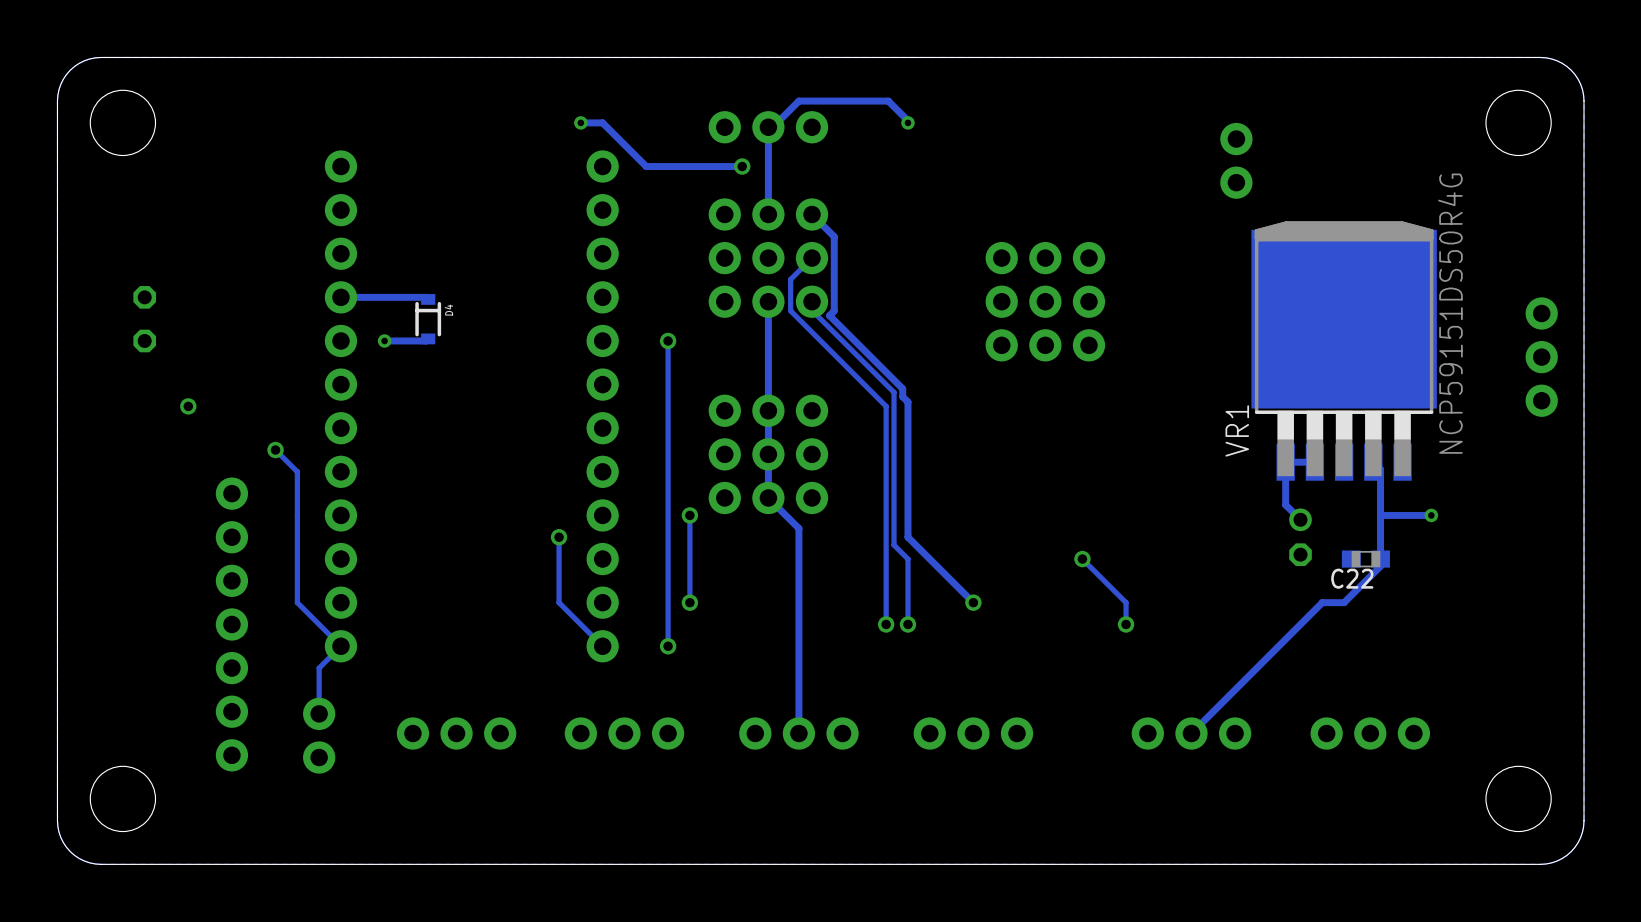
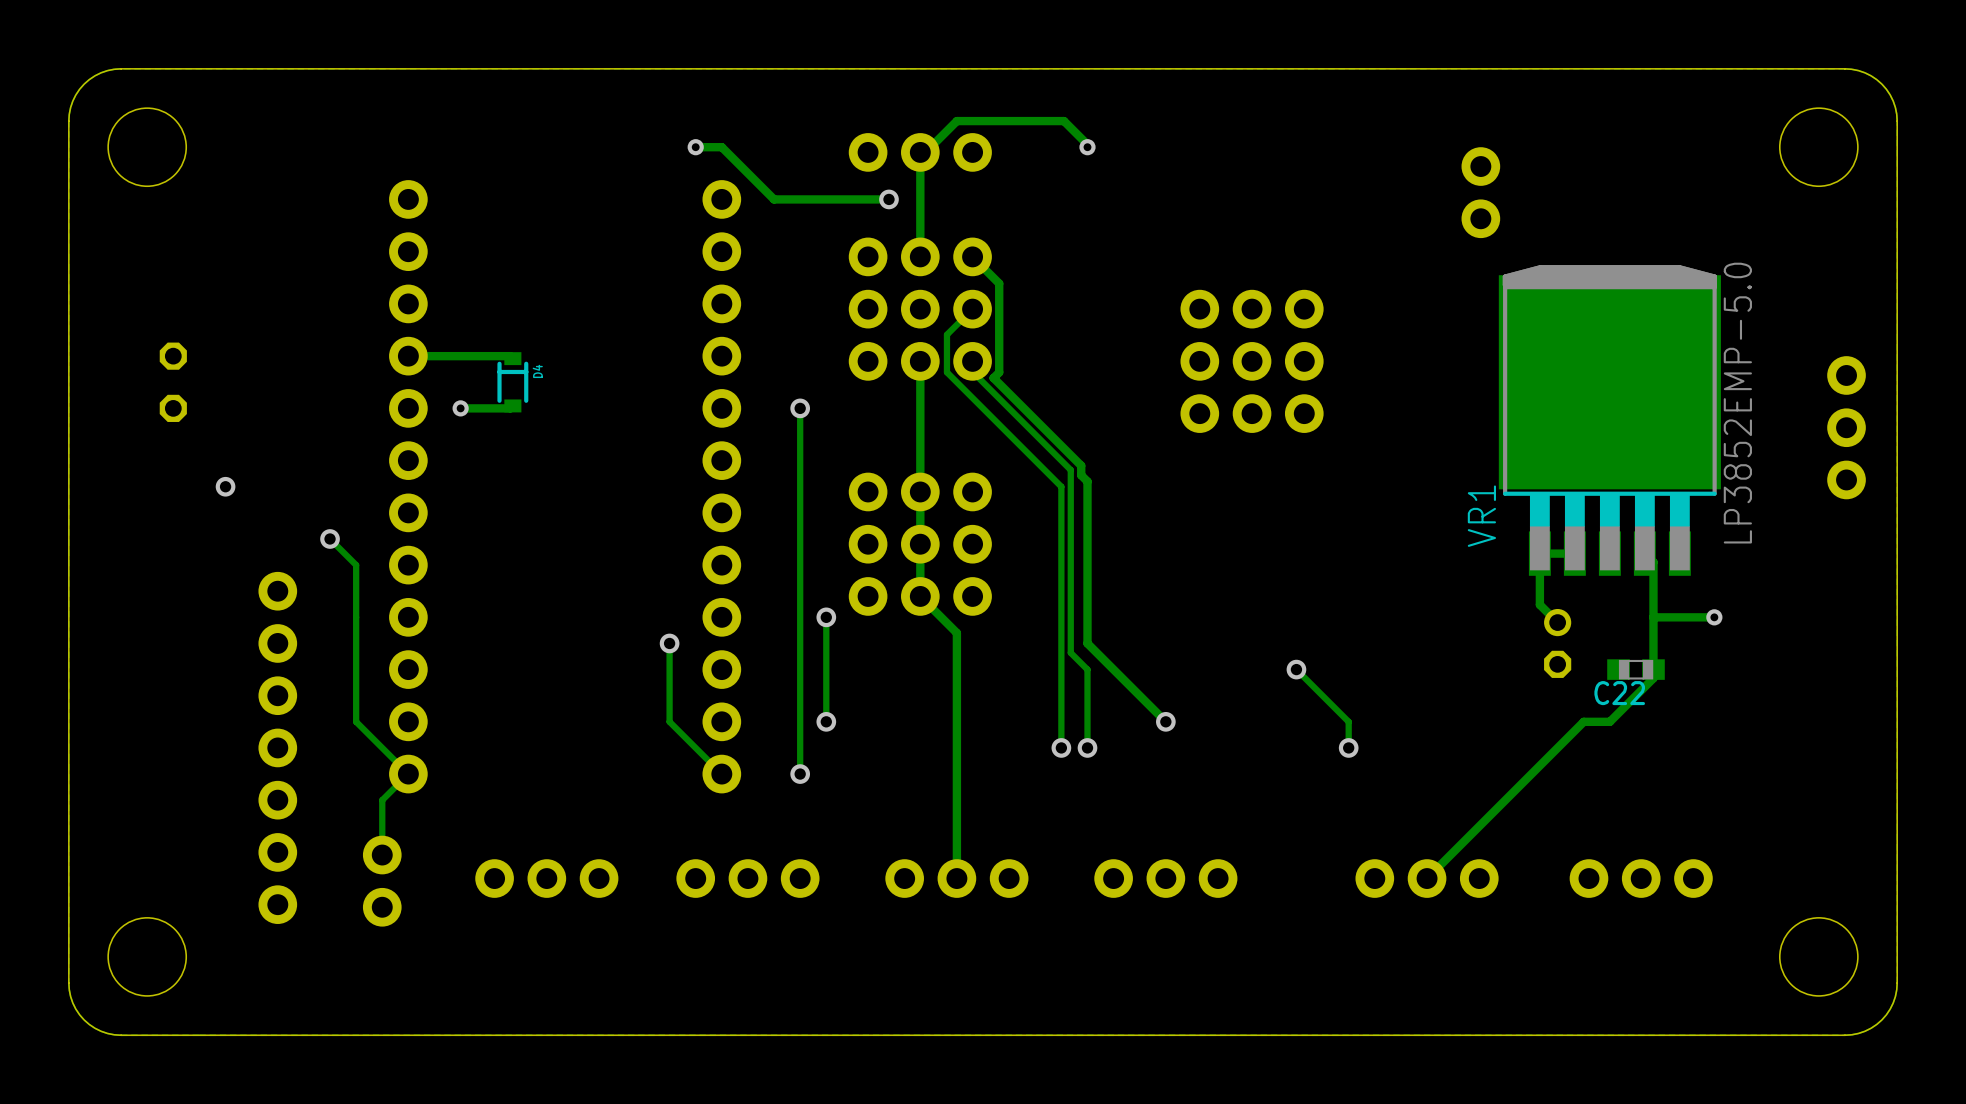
VR1 value: NCP59151DS50R4G (1450, 313) -> LP3852EMP-5.0 (1737, 403)

